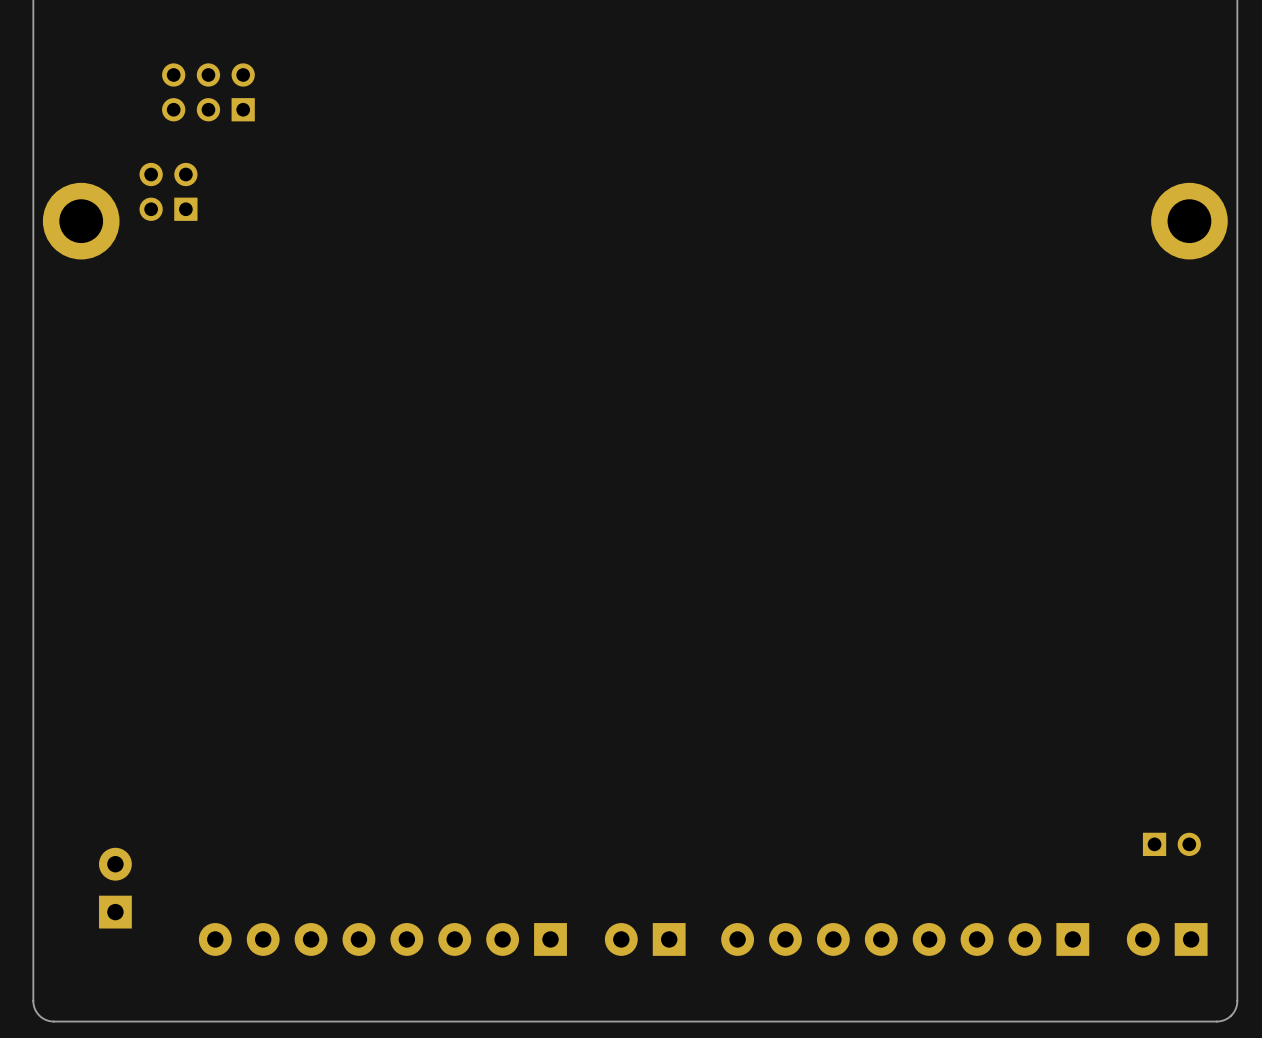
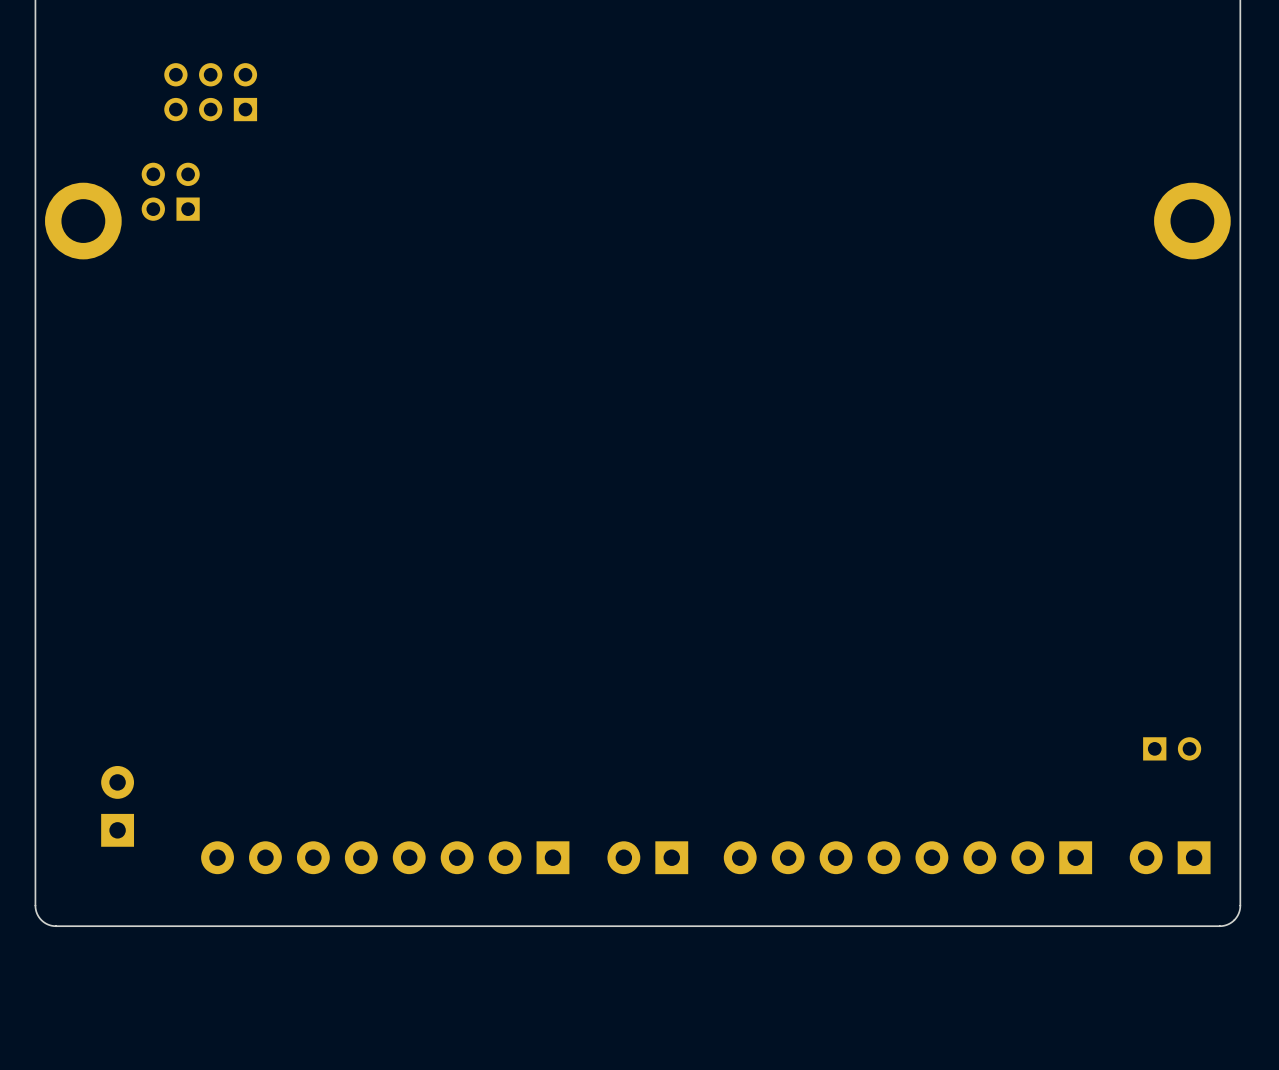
part position: (1171, 844) -> (1172, 748)
part position: (115, 888) -> (117, 806)
board edge: (1237, 905) (1236, 1005) (1229, 1016) (1216, 1021) (51, 1021) (40, 1016) (33, 1005) (33, 905) -> (1240, 905) (1238, 913) (1234, 920) (1227, 924) (1219, 926) (55, 926) (47, 924) (41, 920) (37, 913) (35, 905)
part position: (382, 939) -> (385, 857)
part position: (645, 939) -> (647, 857)
part position: (905, 939) -> (907, 857)
part position: (1167, 939) -> (1170, 857)

